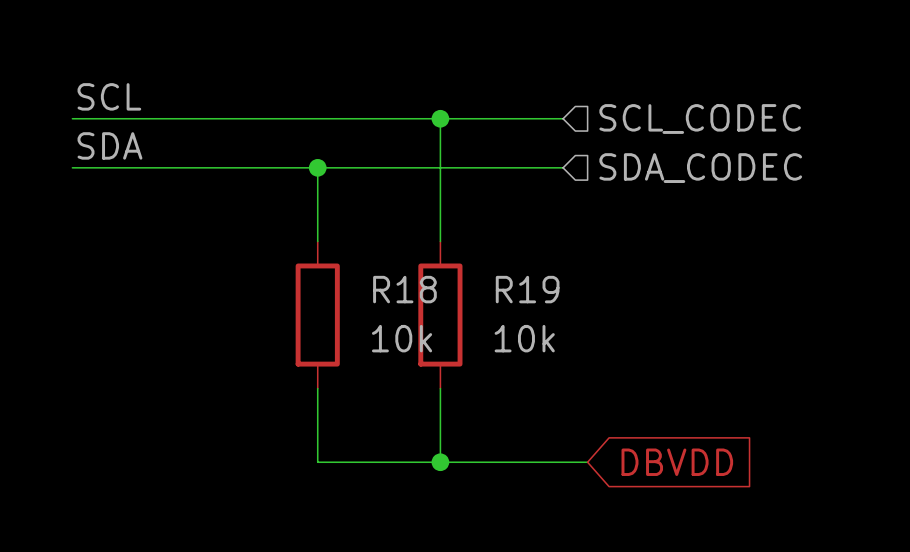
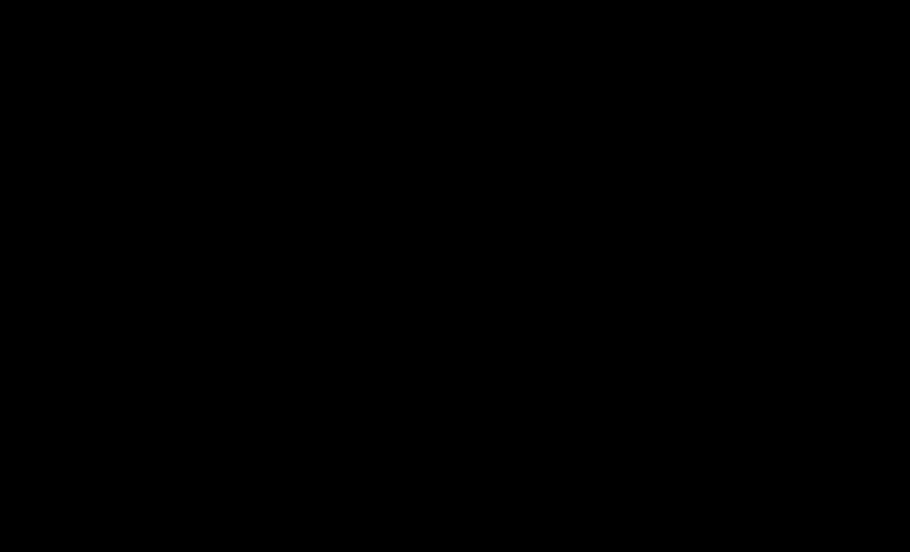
label: SCL (109, 96) -> none
wire: (72, 118) (563, 118) -> none
wire: (440, 118) (440, 241) -> none
junction: (440, 118) -> none
hierarchical label: SCL_CODEC (700, 119) -> none
label: SDA (109, 145) -> none
wire: (72, 167) (563, 167) -> none
wire: (317, 167) (317, 241) -> none
junction: (317, 167) -> none
hierarchical label: SDA_CODEC (700, 168) -> none
R18: 10k (317, 315) -> none
R19: 10k (440, 315) -> none
wire: (317, 388) (317, 462) (587, 462) -> none
wire: (440, 388) (440, 462) -> none
junction: (440, 462) -> none
global label: DBVDD (677, 462) -> none

